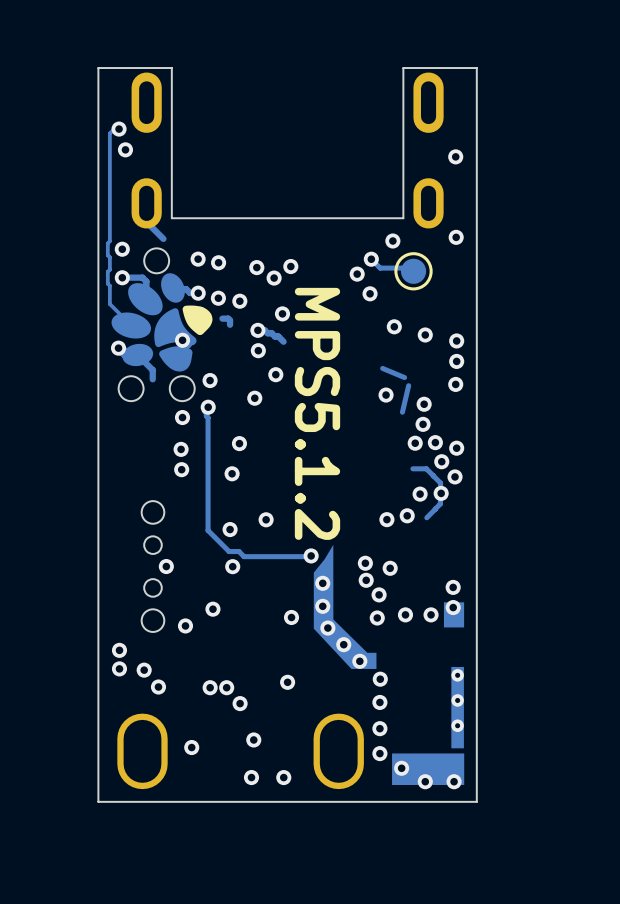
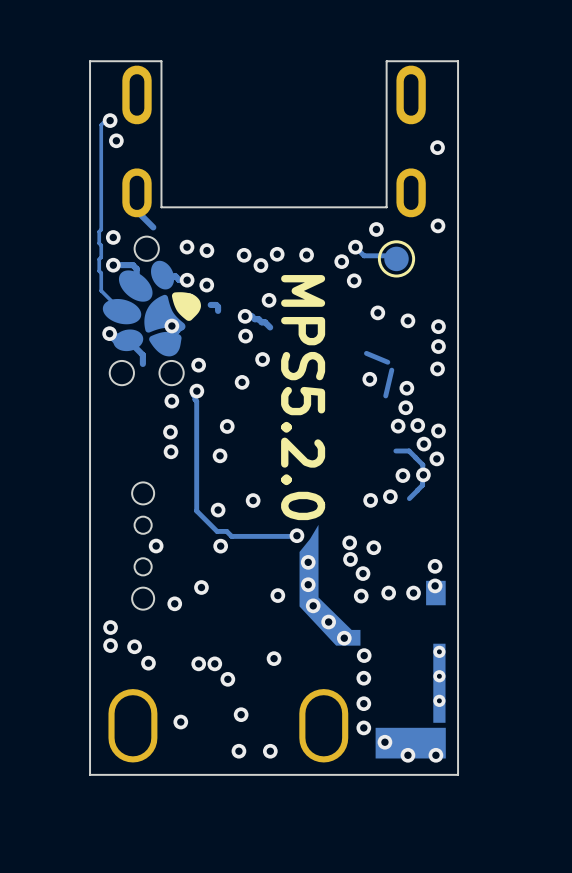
via position: (239, 301) -> (306, 255)
text: MPS5.1.2 (317, 413) -> MPS5.2.0 (303, 397)

